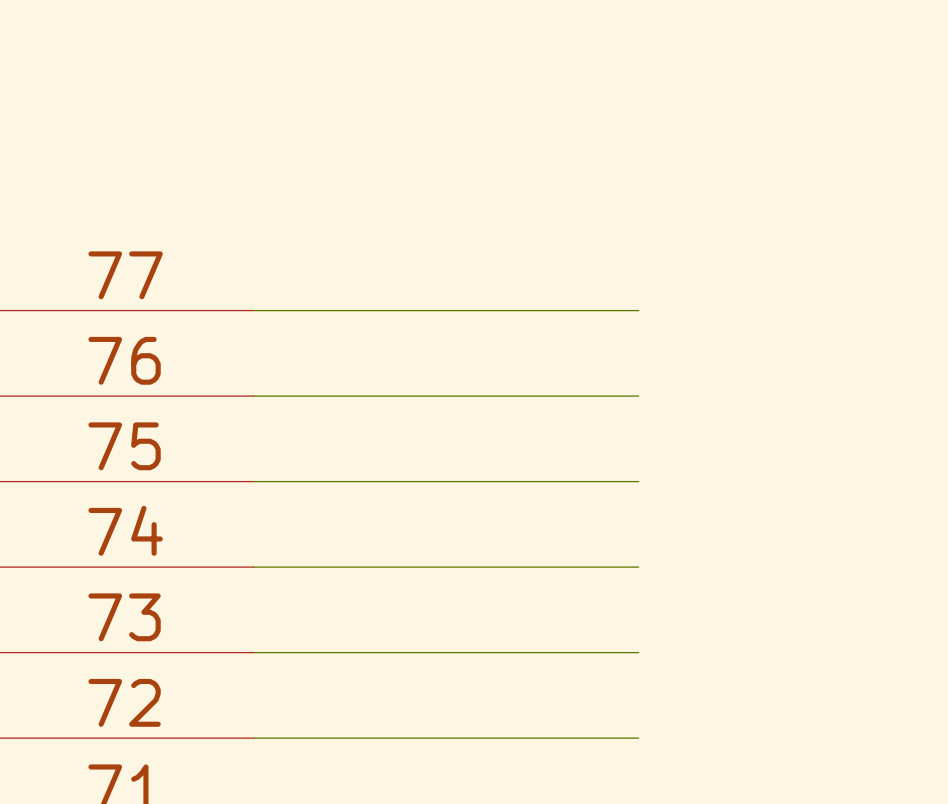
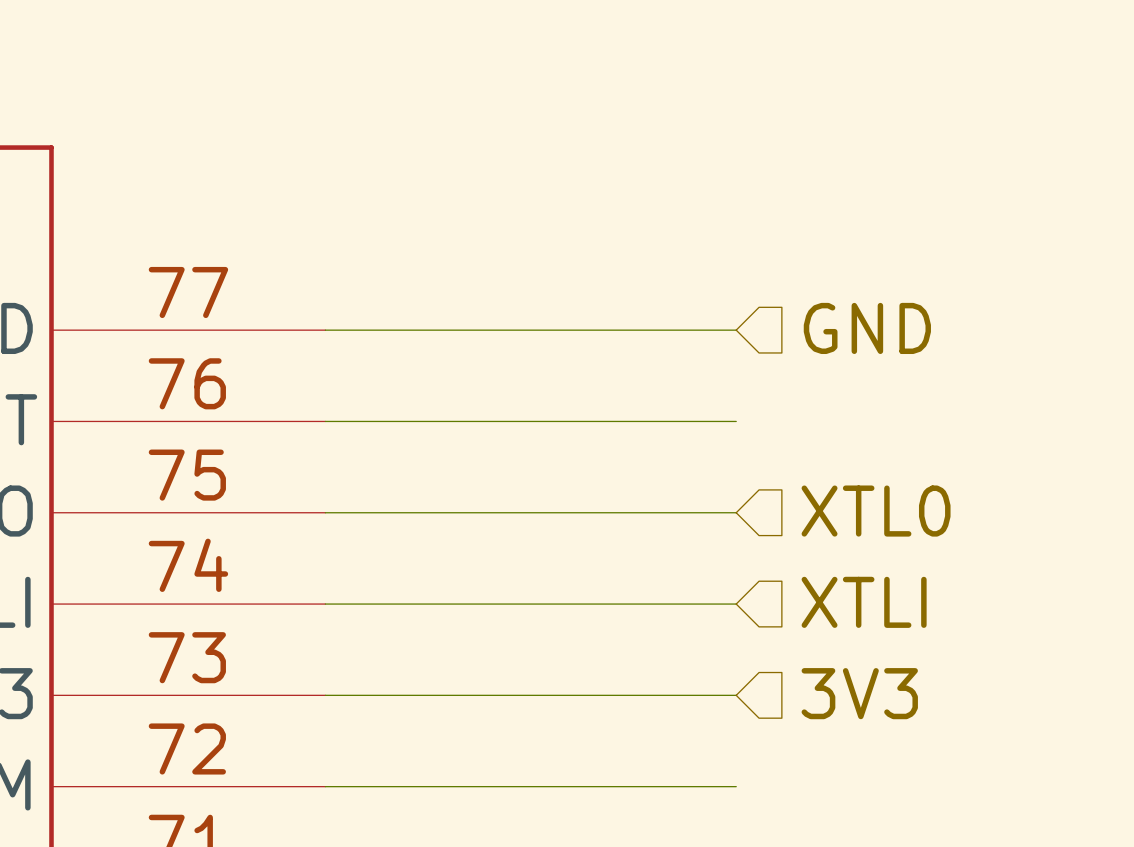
hierarchical label: none -> GND (867, 328)
hierarchical label: none -> XTL0 (876, 511)
hierarchical label: none -> XTLI (864, 602)
hierarchical label: none -> 3V3 (859, 693)

